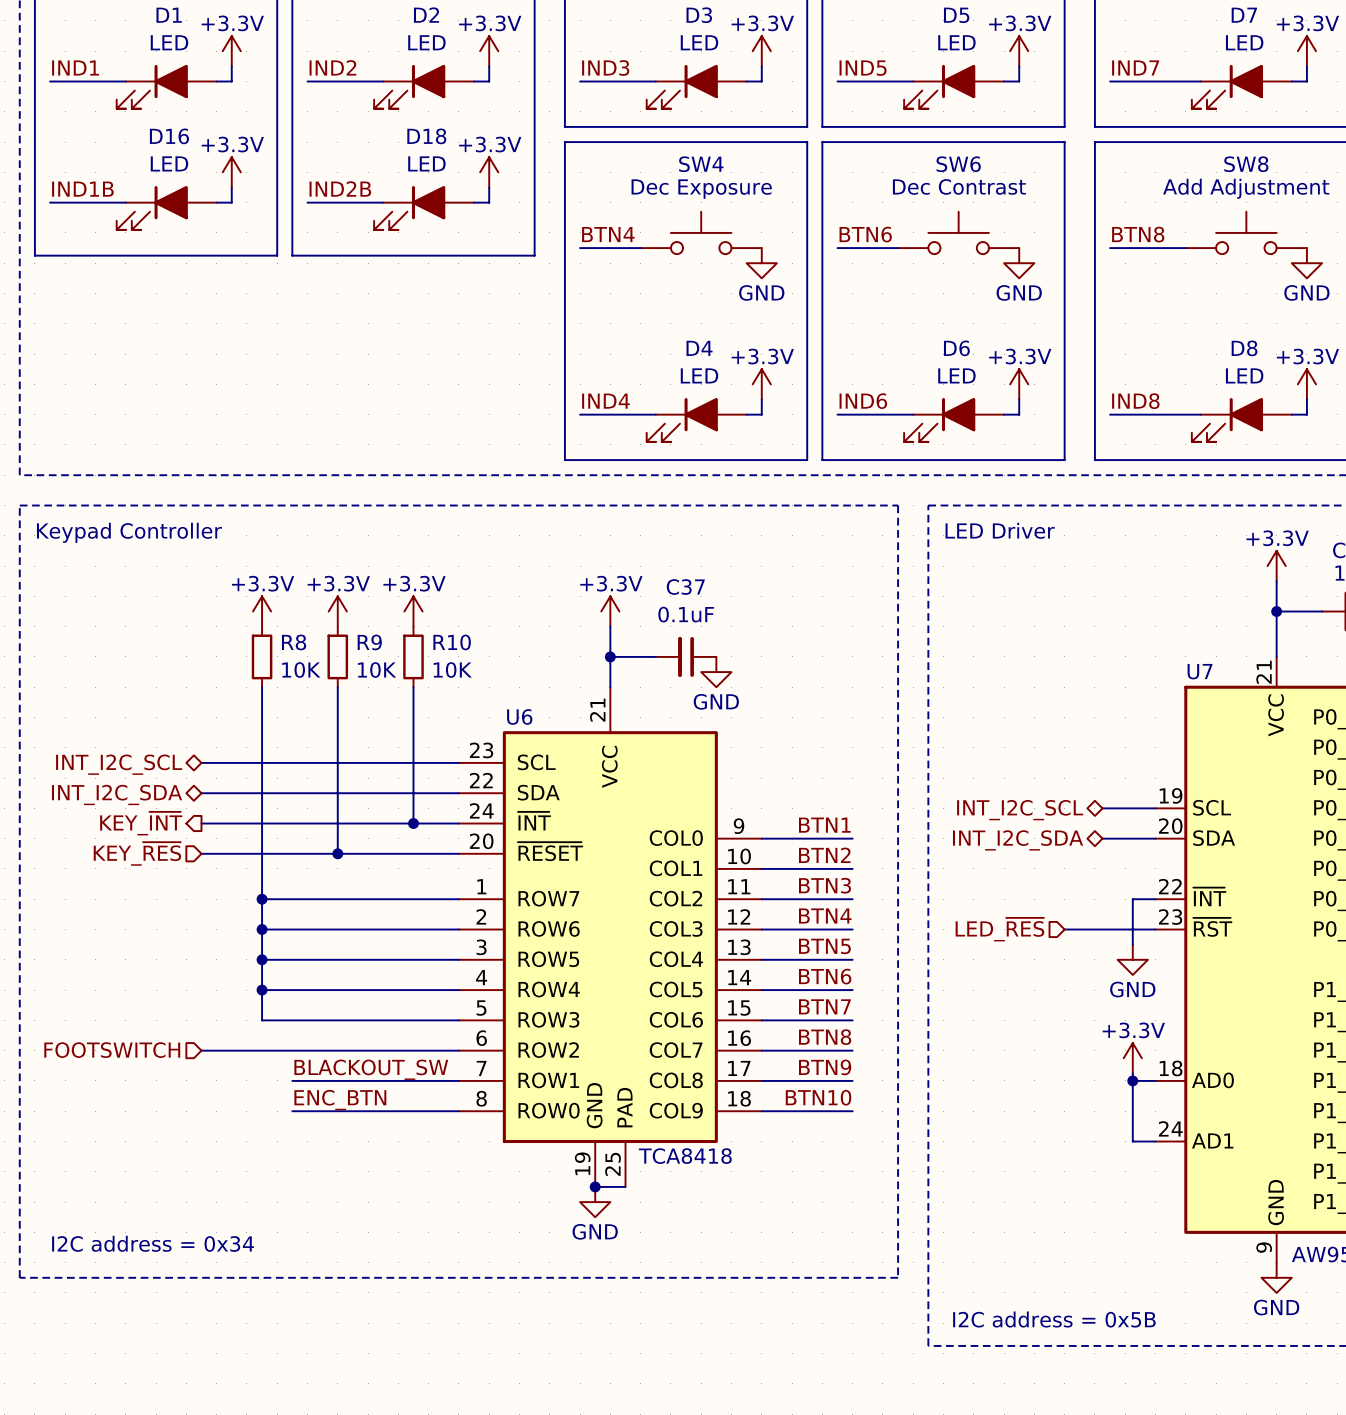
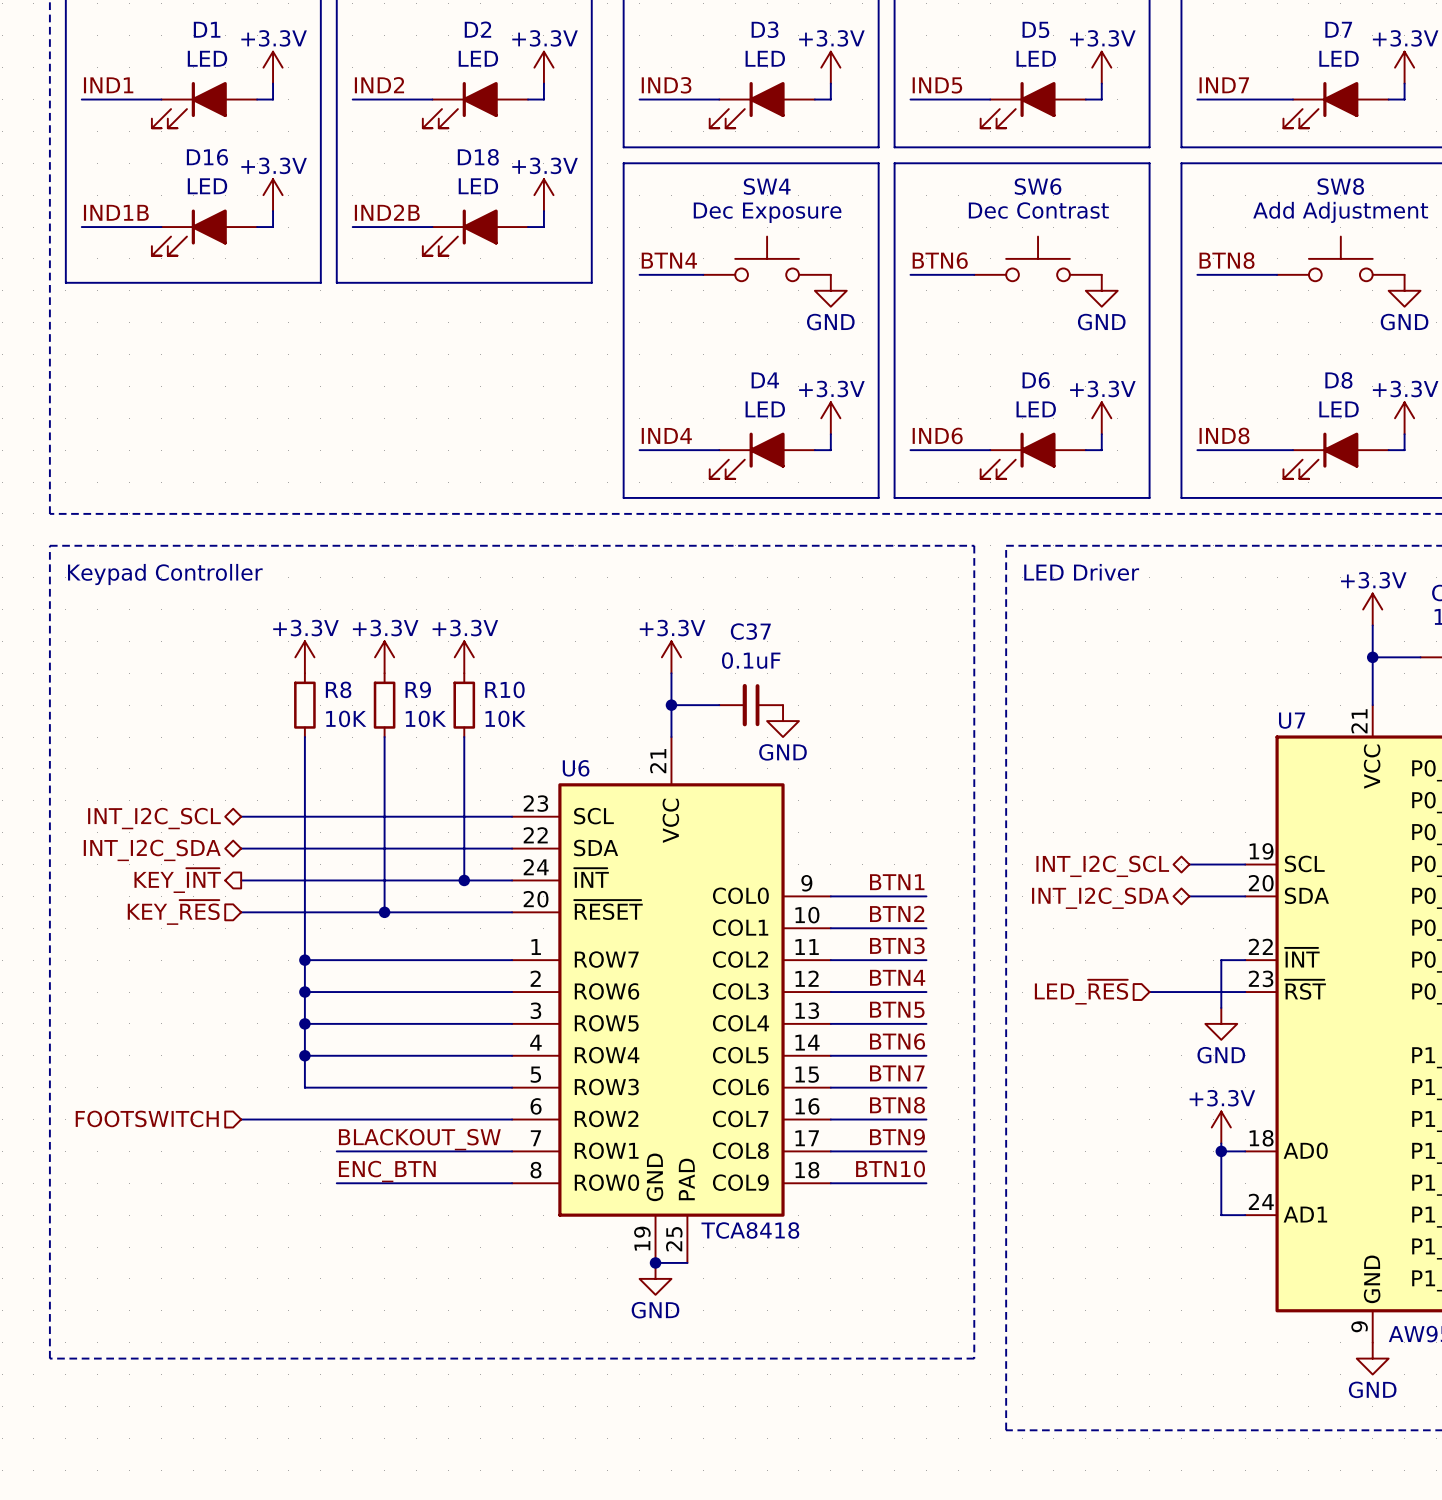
text: I2C address = 0x34 (153, 1243) -> none
text: I2C address = 0x5B (1054, 1319) -> none

